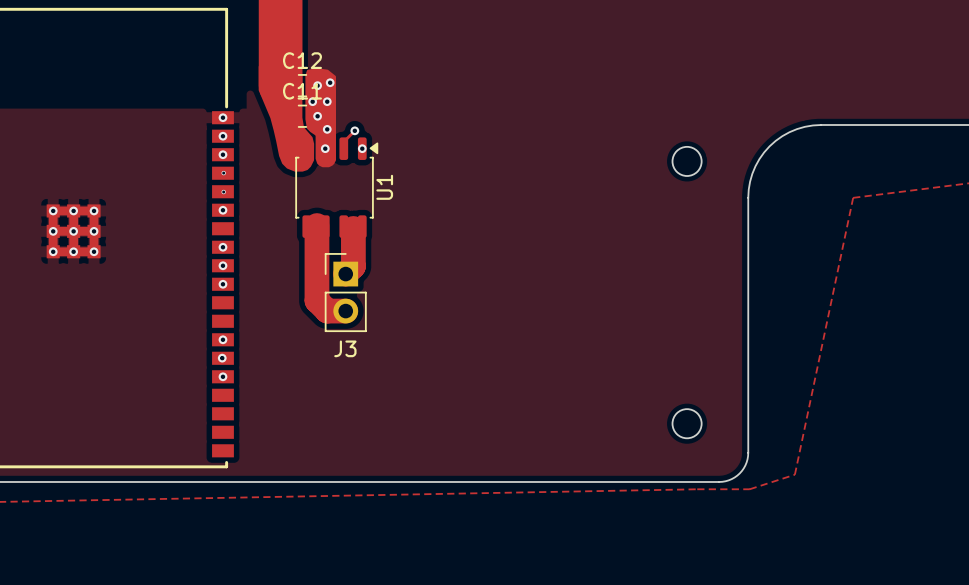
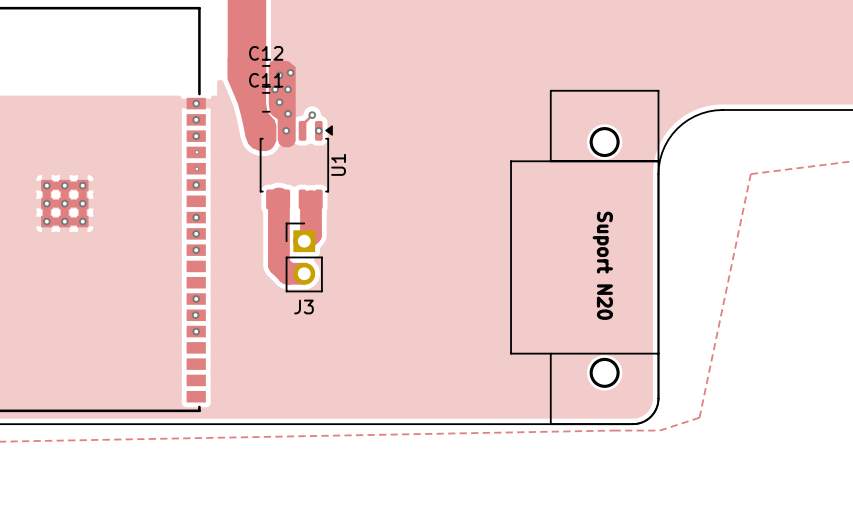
drawing: none -> [589, 127, 620, 157]
line: none -> (550, 161) (550, 90) (658, 90) (658, 398) (655, 409) (646, 420) (635, 424) (550, 424) (550, 353)
line: none -> (658, 161) (511, 161) (511, 353) (658, 353)
text: none -> Suport N20 (602, 265)
drawing: none -> [589, 358, 620, 388]

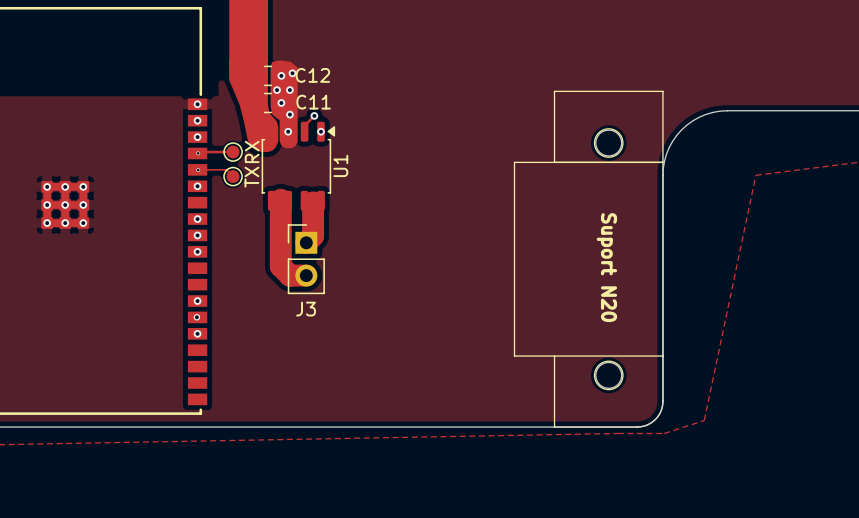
C12 name position: C12 (266, 53) -> C12 (312, 75)
C11 name position: C11 (266, 80) -> C11 (313, 102)
text: none -> RX (252, 151)
track: none -> (233, 152) (198, 153)
part: none -> (233, 152)
track: none -> (197, 169) (226, 169) (233, 176)
part: none -> (233, 176)
text: none -> TX (251, 177)
via: (195, 315) -> none
via: none -> (196, 317)

